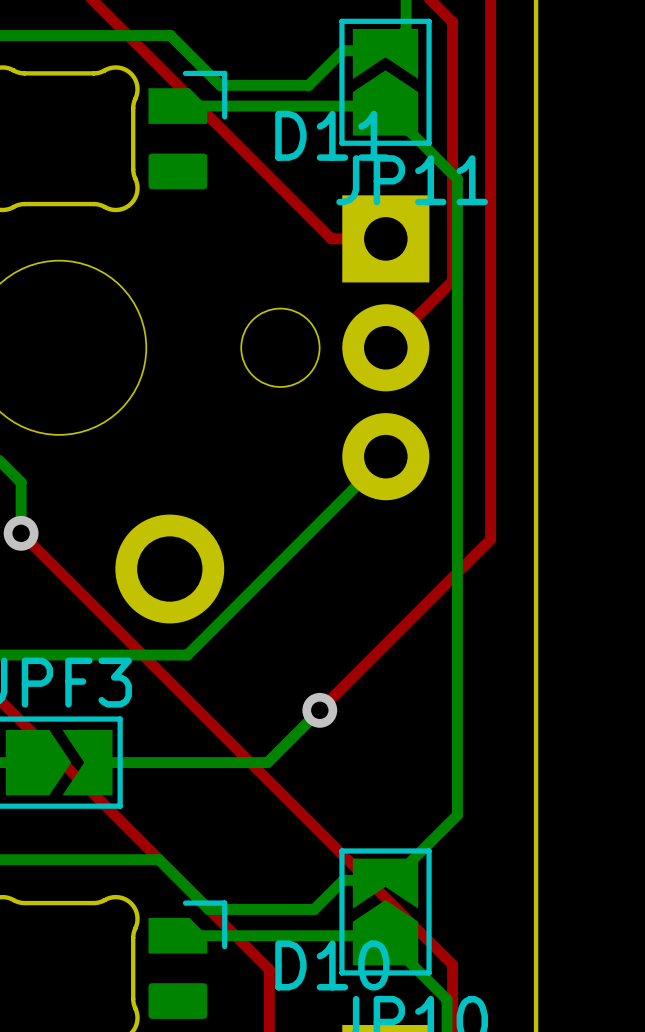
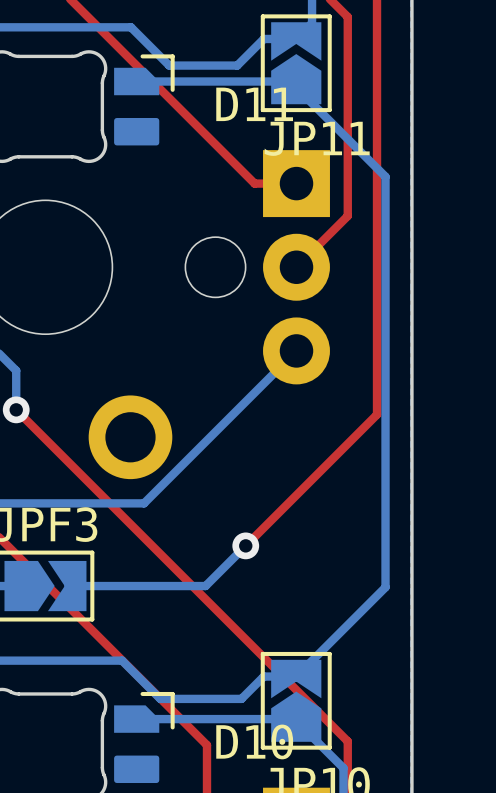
bottom track: (385, 113) (392, 113) (457, 179) (457, 815) (392, 880) (385, 880) -> (296, 87) (385, 176) (385, 587) (296, 676)

